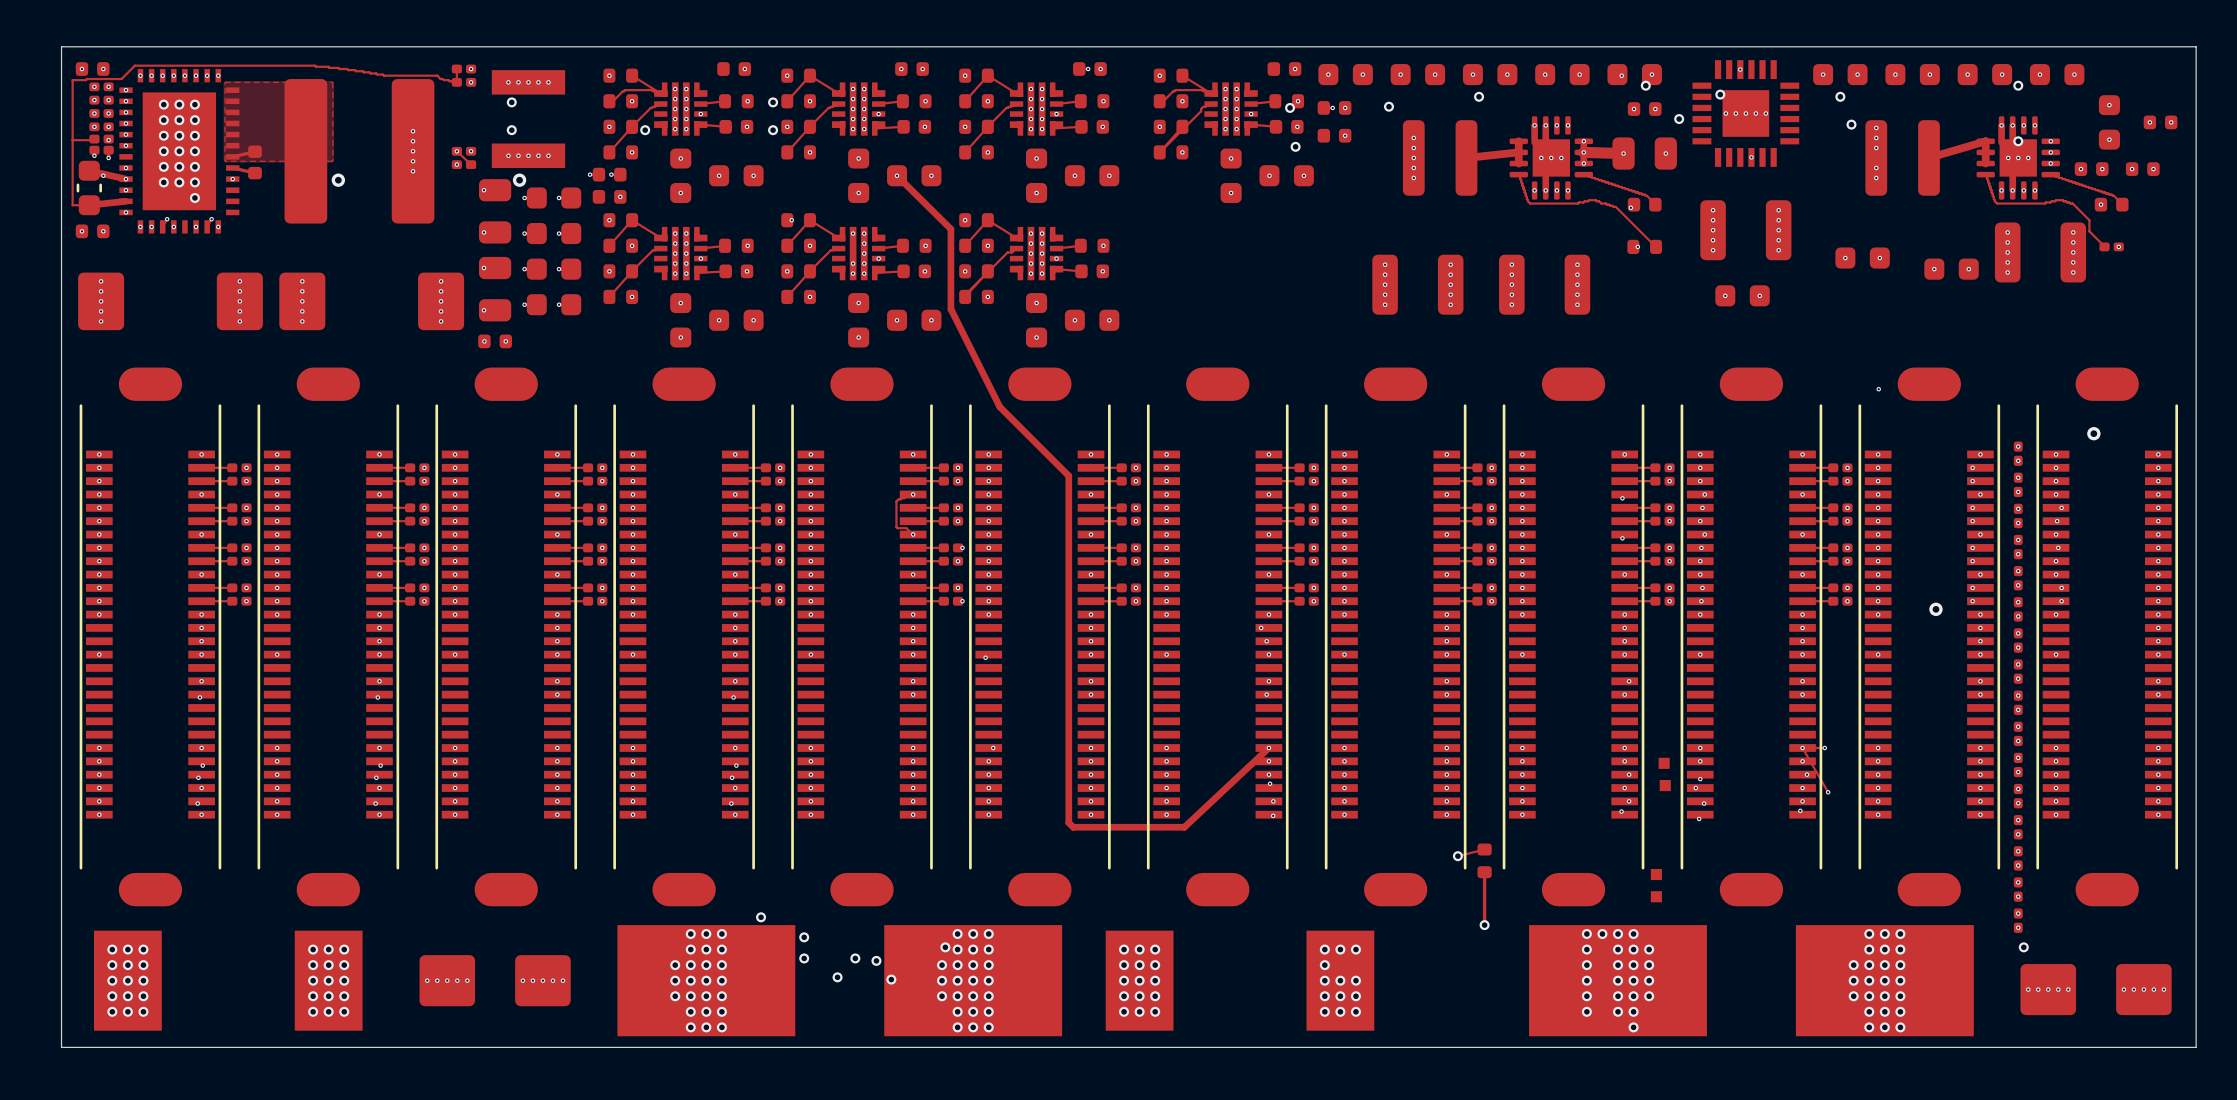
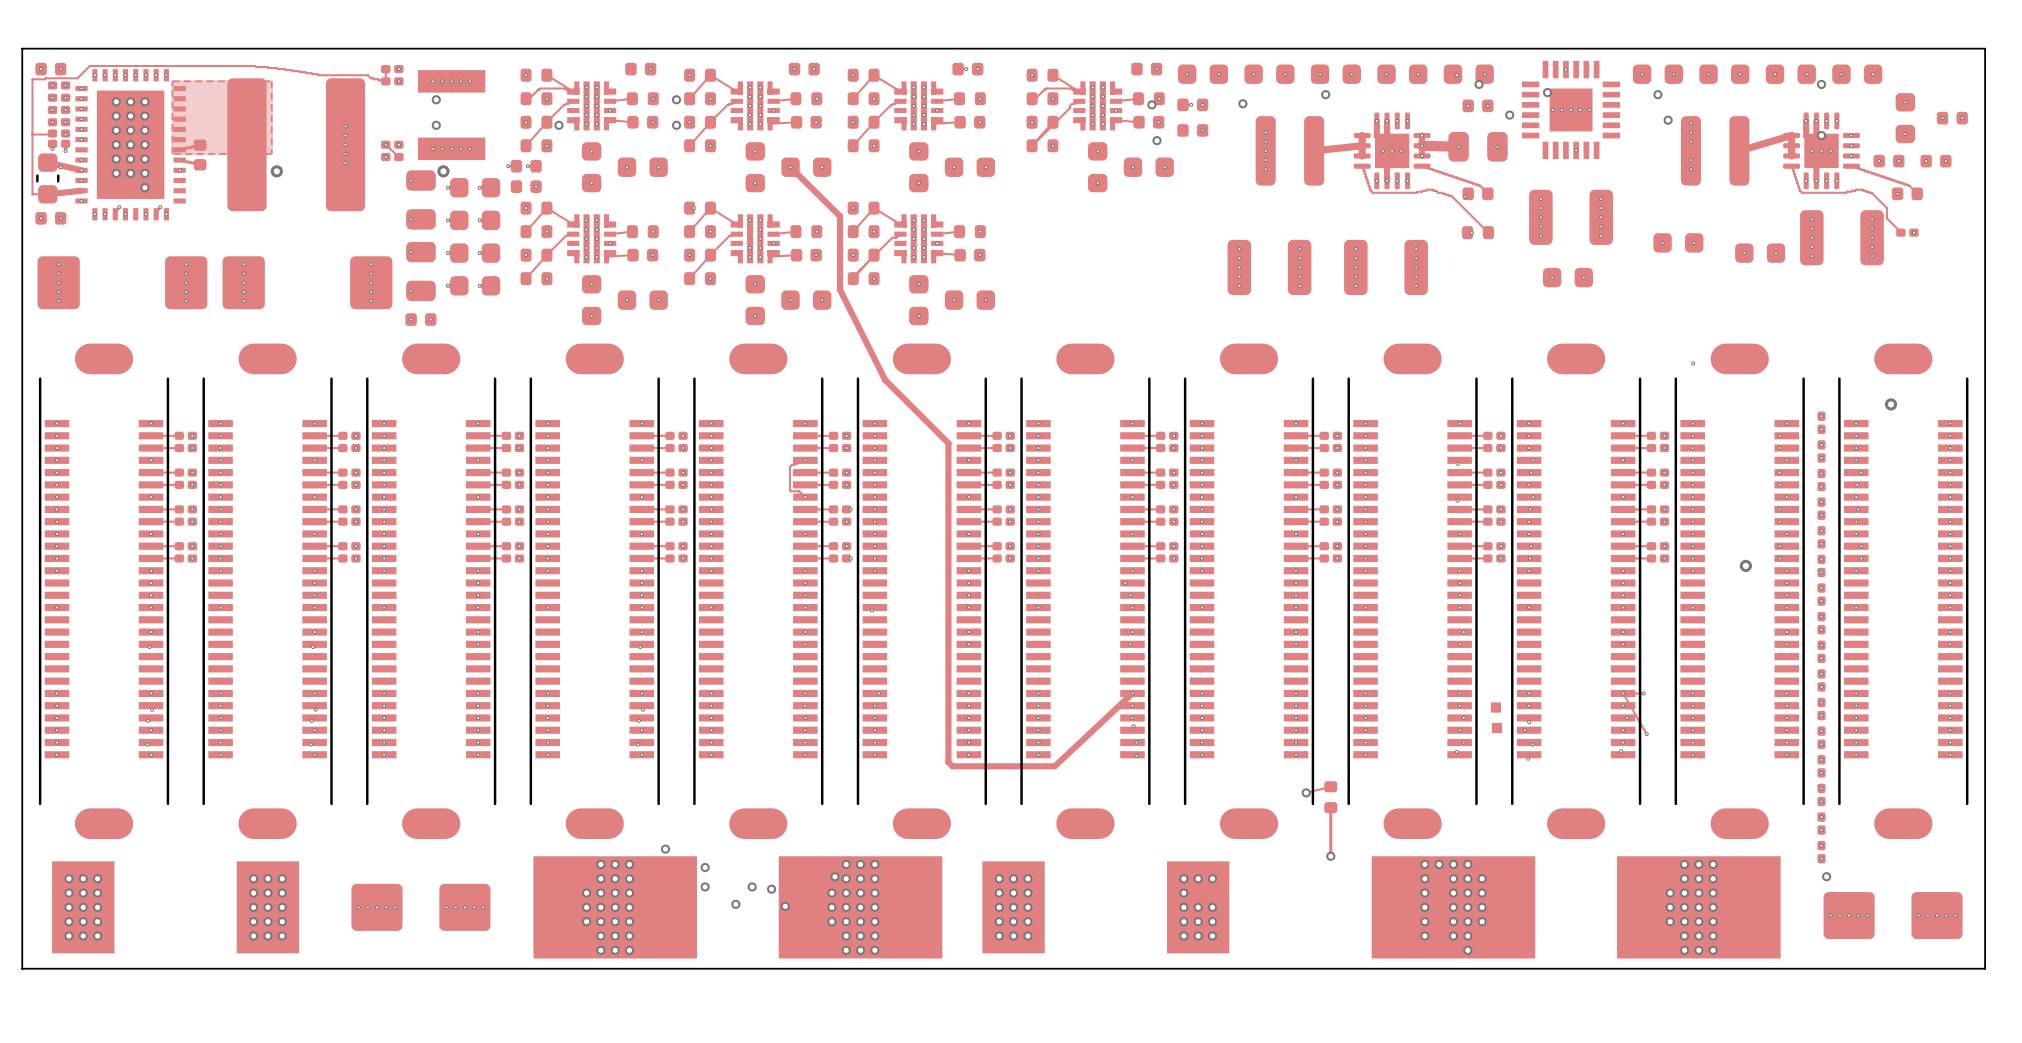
part: (1656, 874) -> none
part: (1656, 896) -> none

